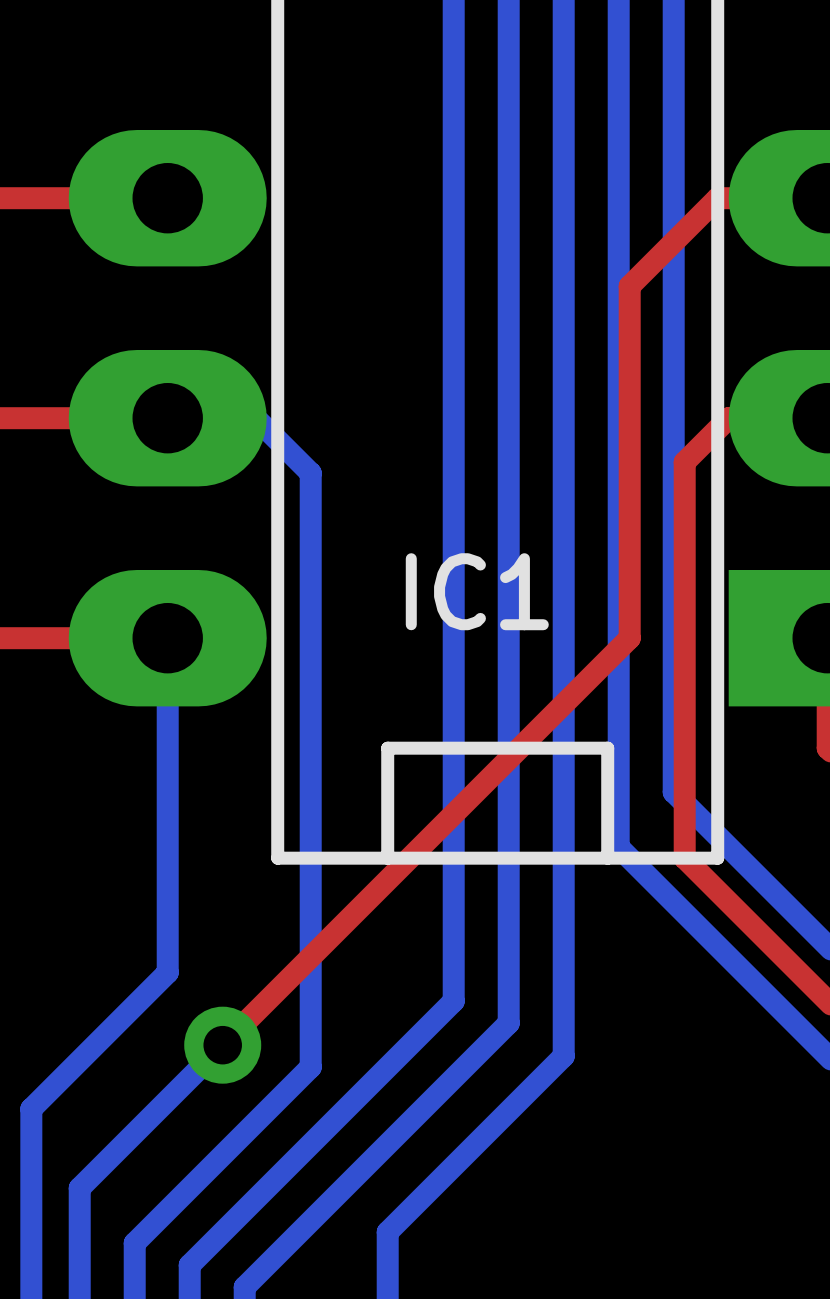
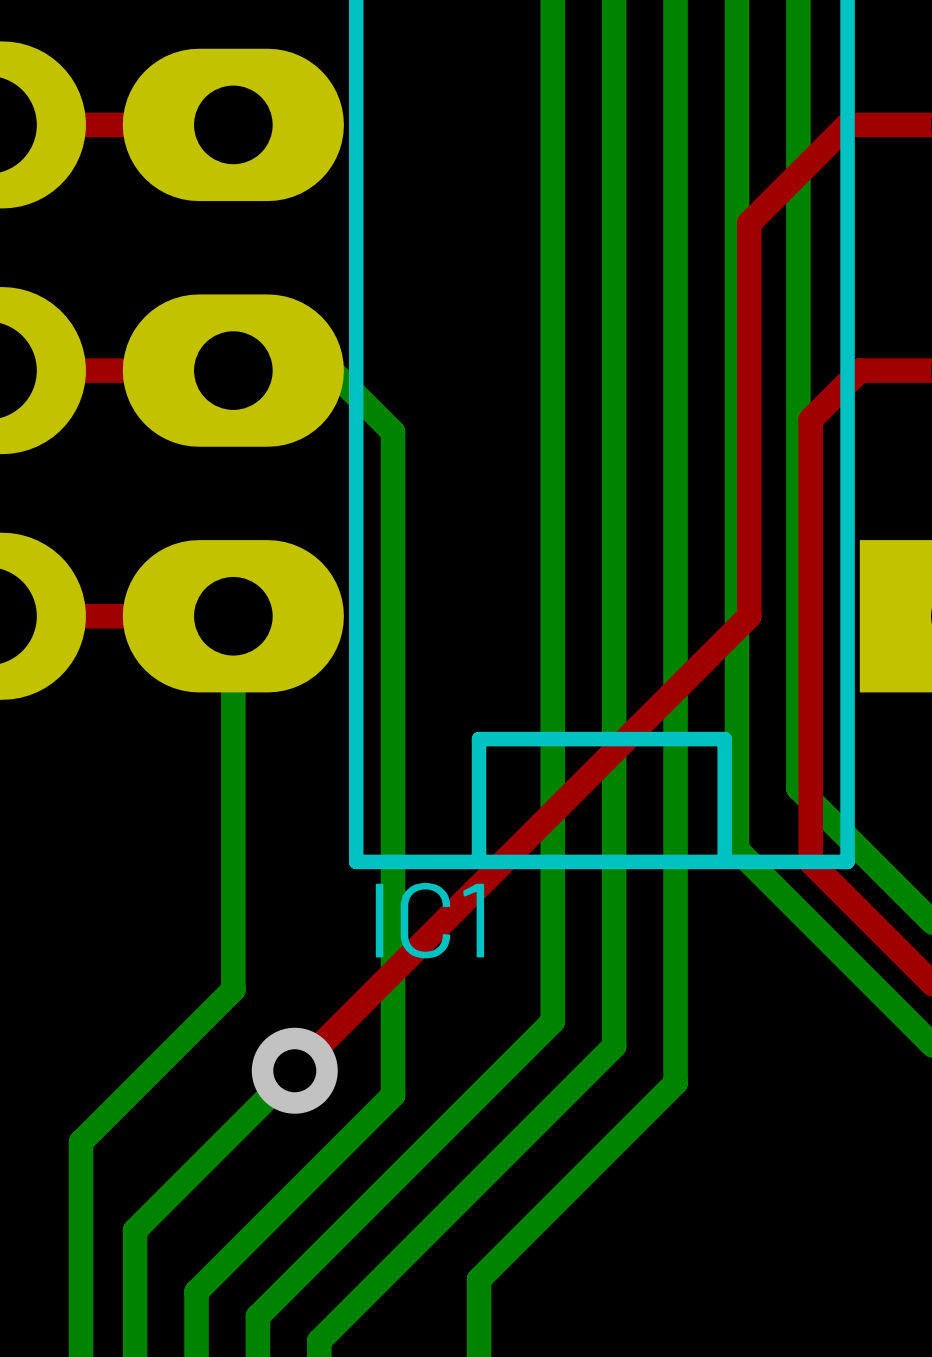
IC1 name position: IC1 (477, 591) -> IC1 (429, 920)

